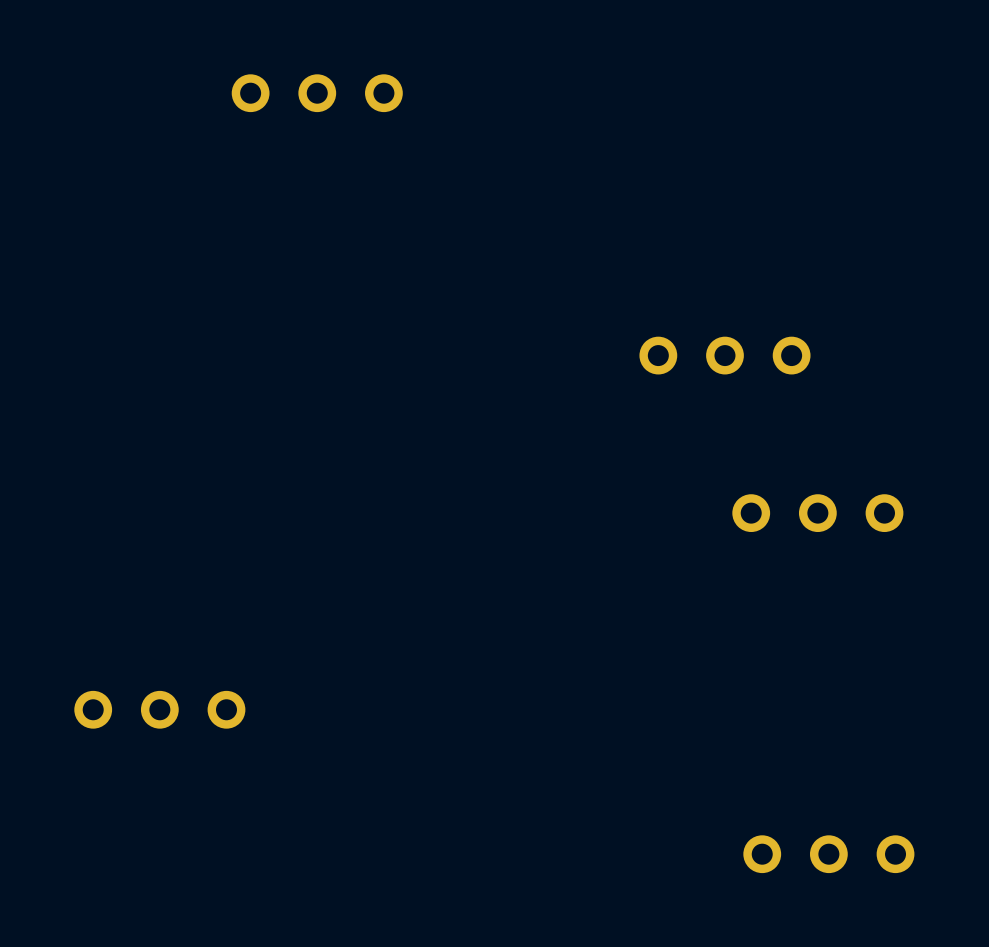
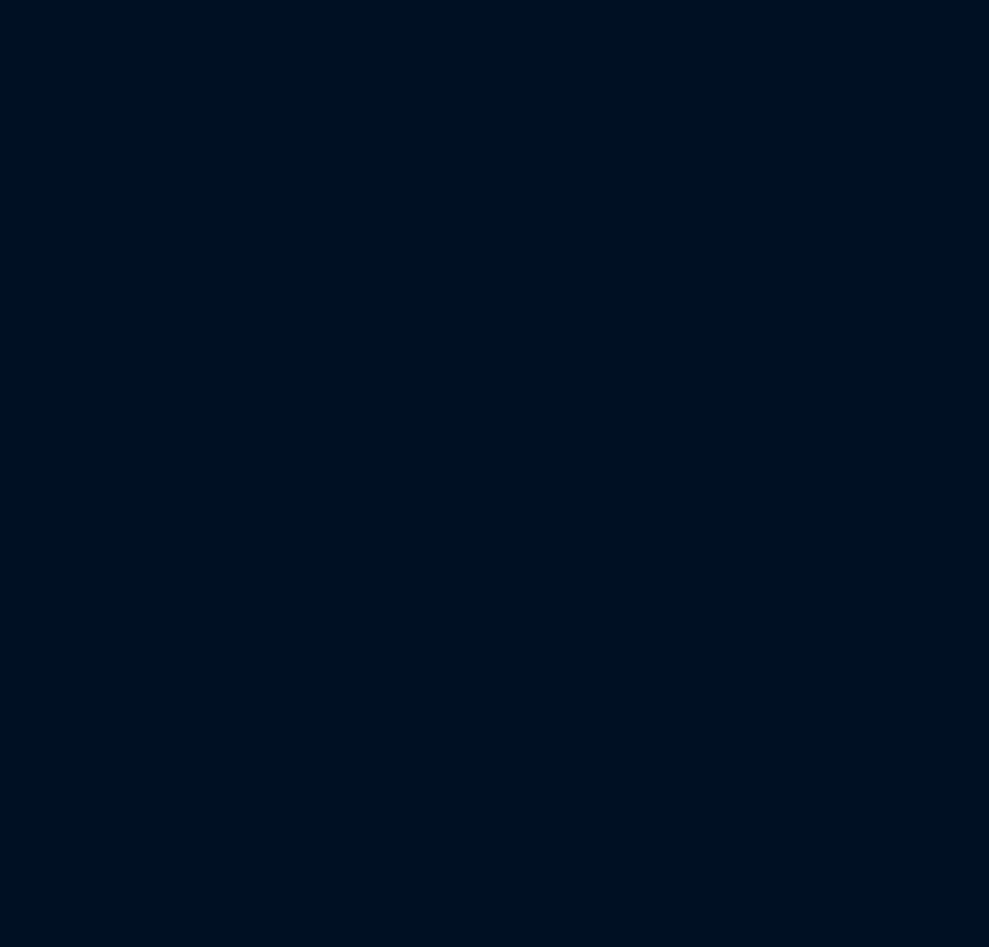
part: (317, 93) -> none
part: (724, 355) -> none
part: (817, 513) -> none
part: (159, 709) -> none
part: (828, 854) -> none

